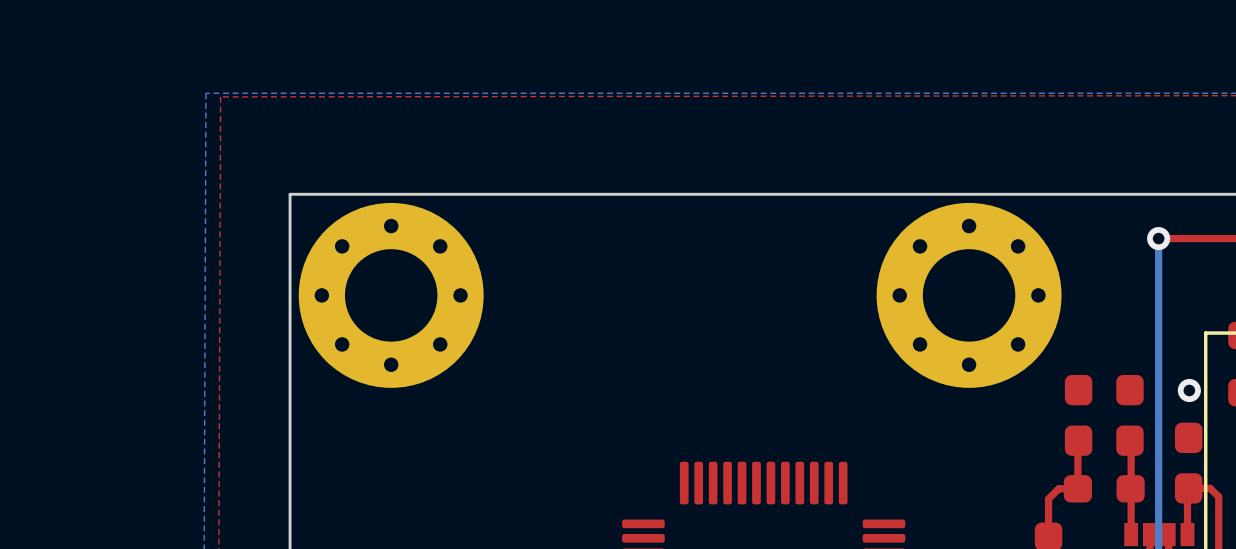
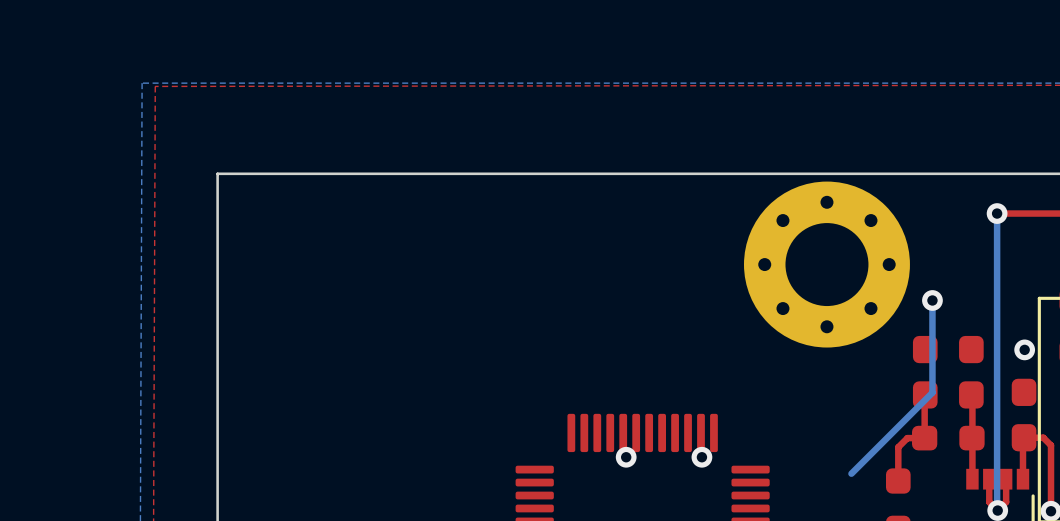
part: (391, 295) -> none
bottom track: none -> (932, 300) (932, 392) (851, 473)
via: none -> (932, 300)
via: none -> (626, 457)
via: none -> (701, 457)

